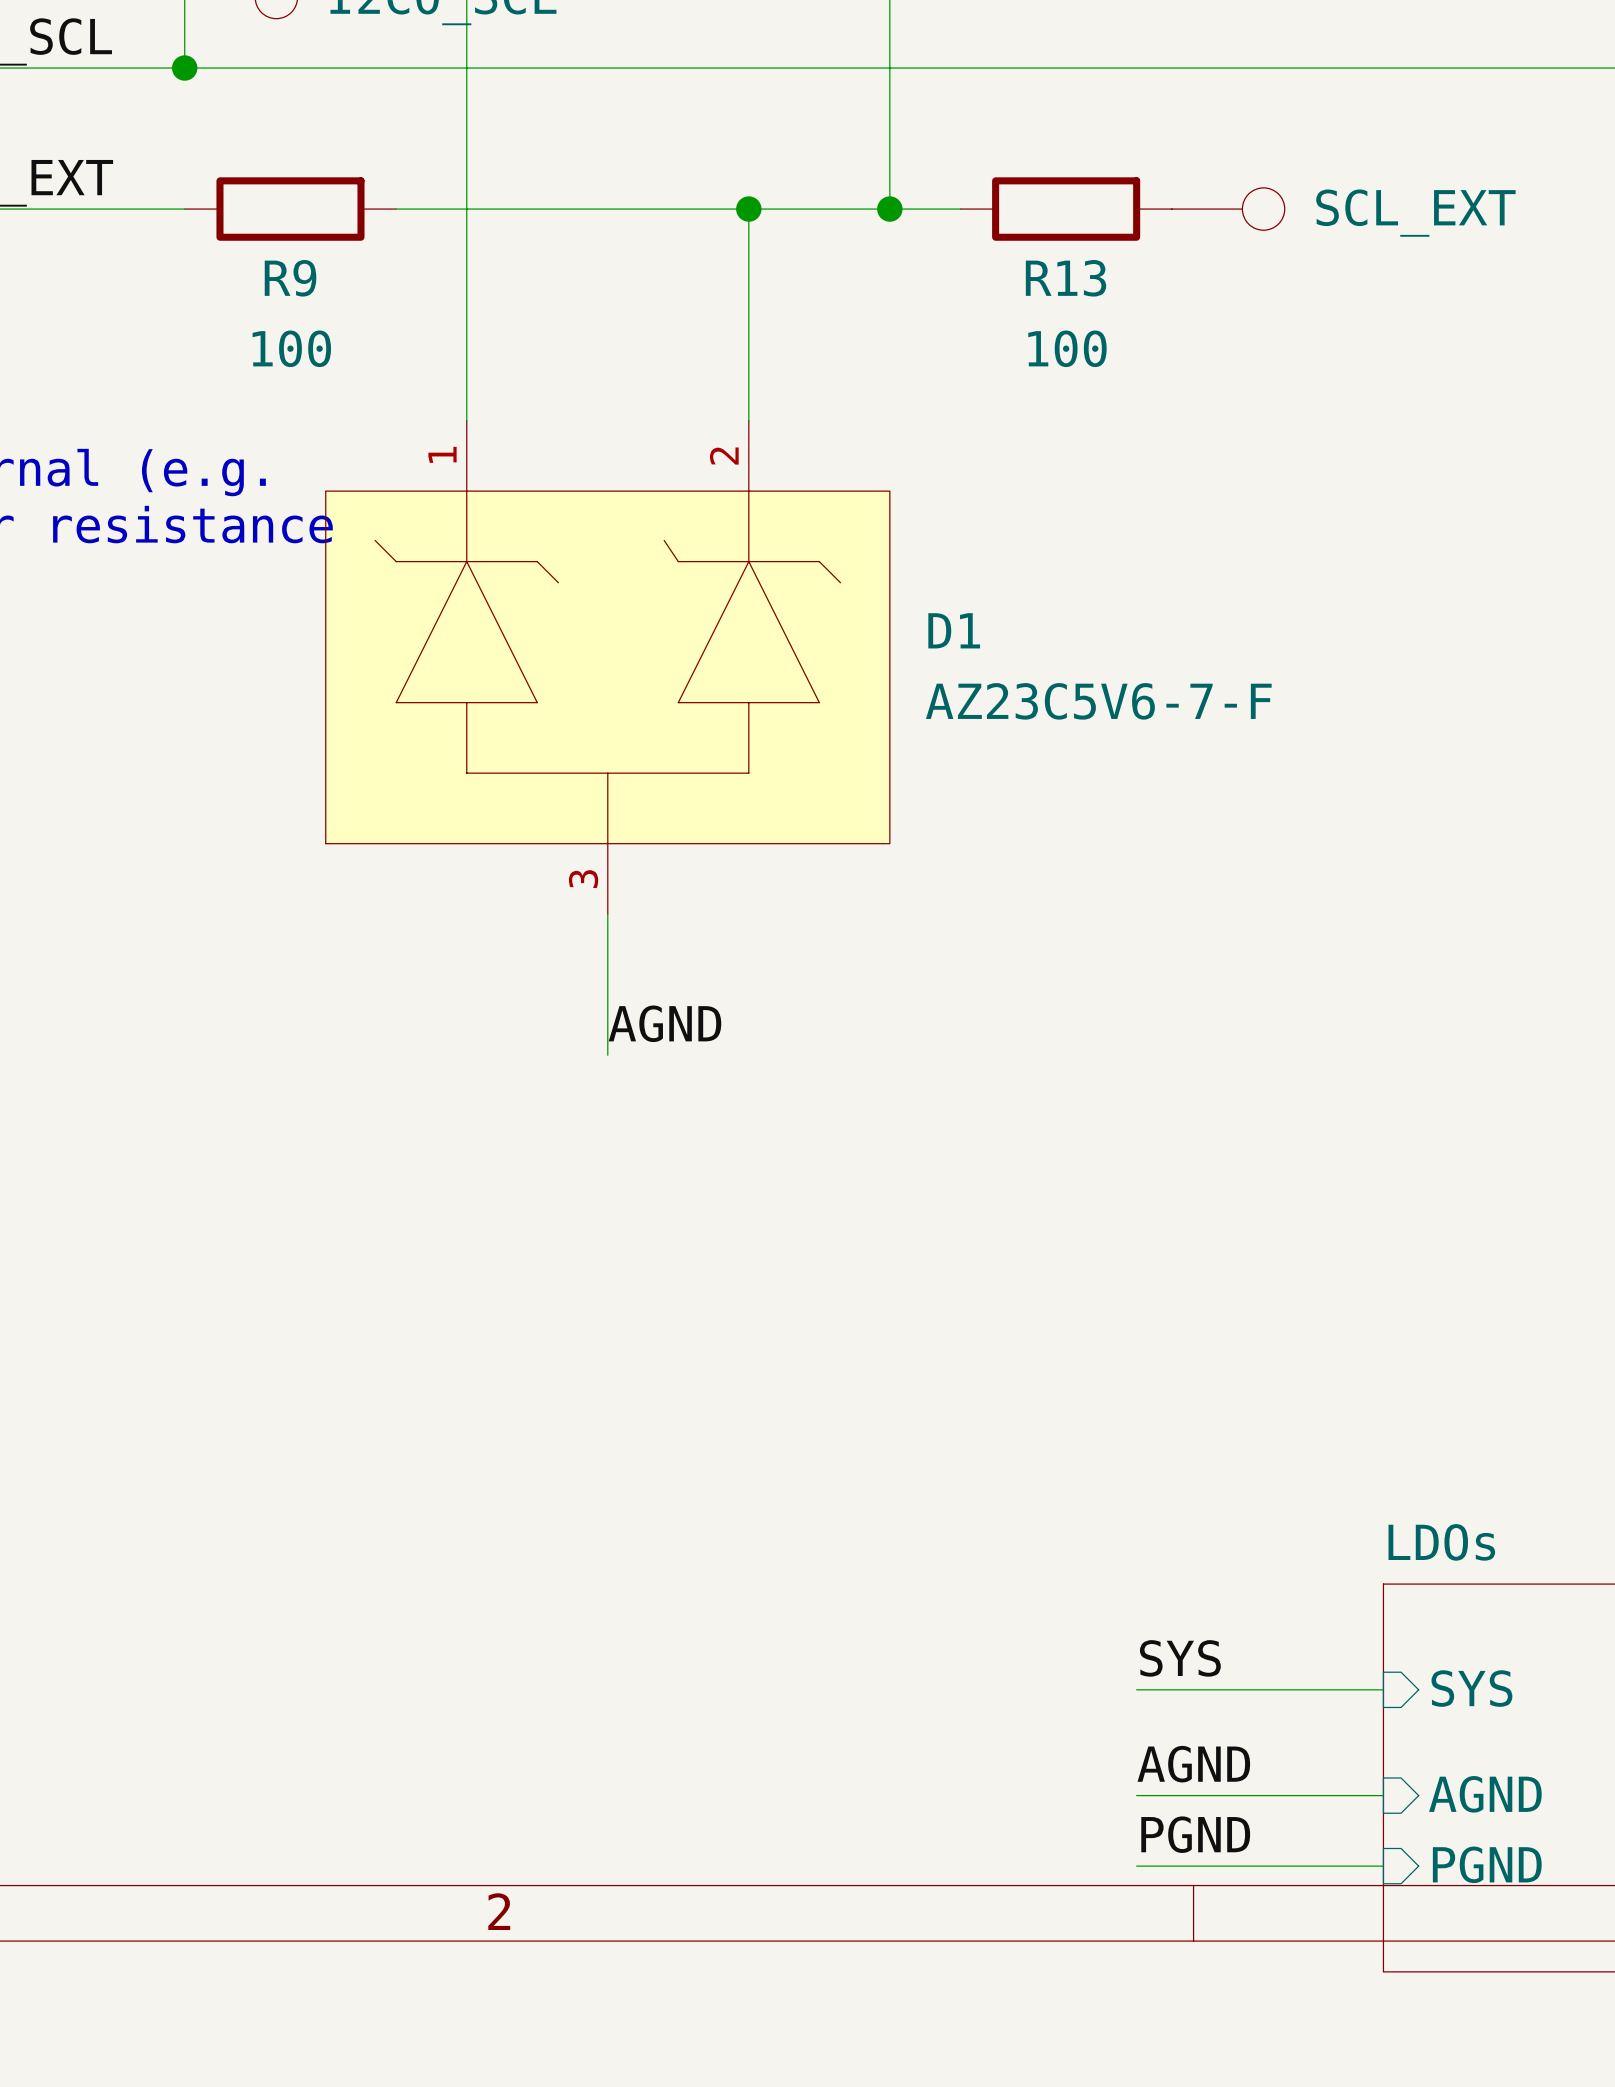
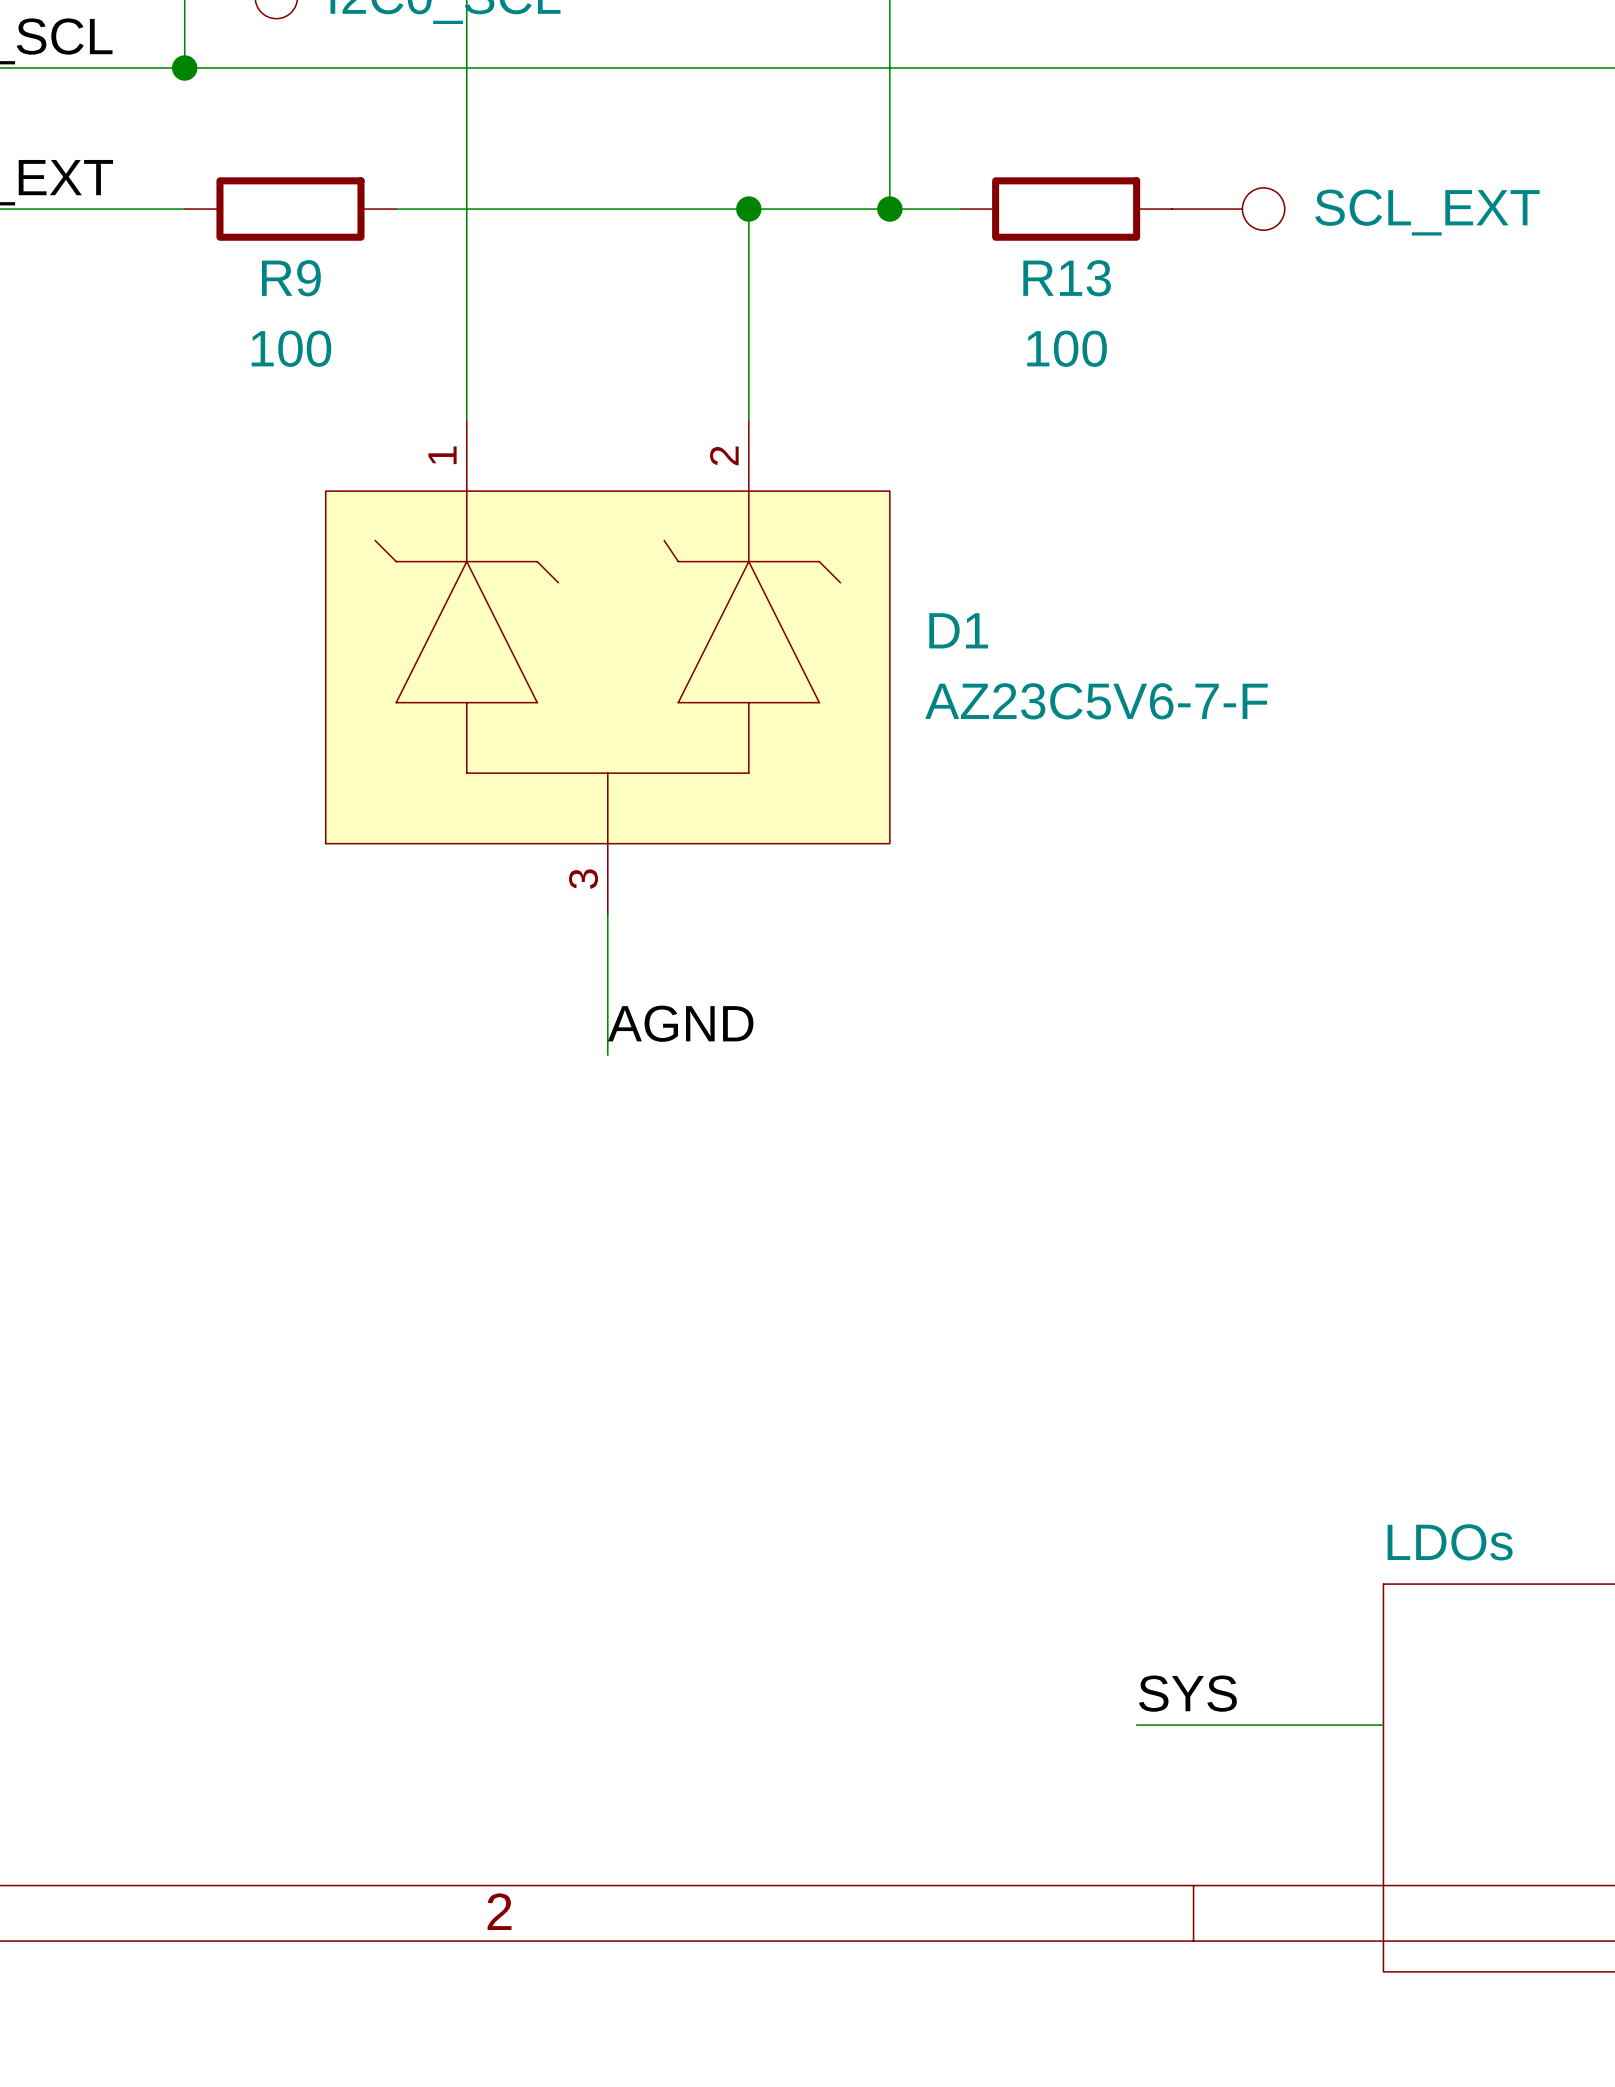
label position: SYS (1180, 1658) -> SYS (1187, 1693)
sheet pin: SYS (1471, 1688) -> none
wire: (1136, 1689) (1383, 1689) -> (1136, 1725) (1383, 1725)
label: AGND (1193, 1764) -> none
sheet pin: AGND (1485, 1794) -> none
wire: (1136, 1795) (1383, 1795) -> none
label: PGND (1195, 1834) -> none
sheet pin: PGND (1487, 1864) -> none
wire: (1136, 1866) (1383, 1866) -> none

